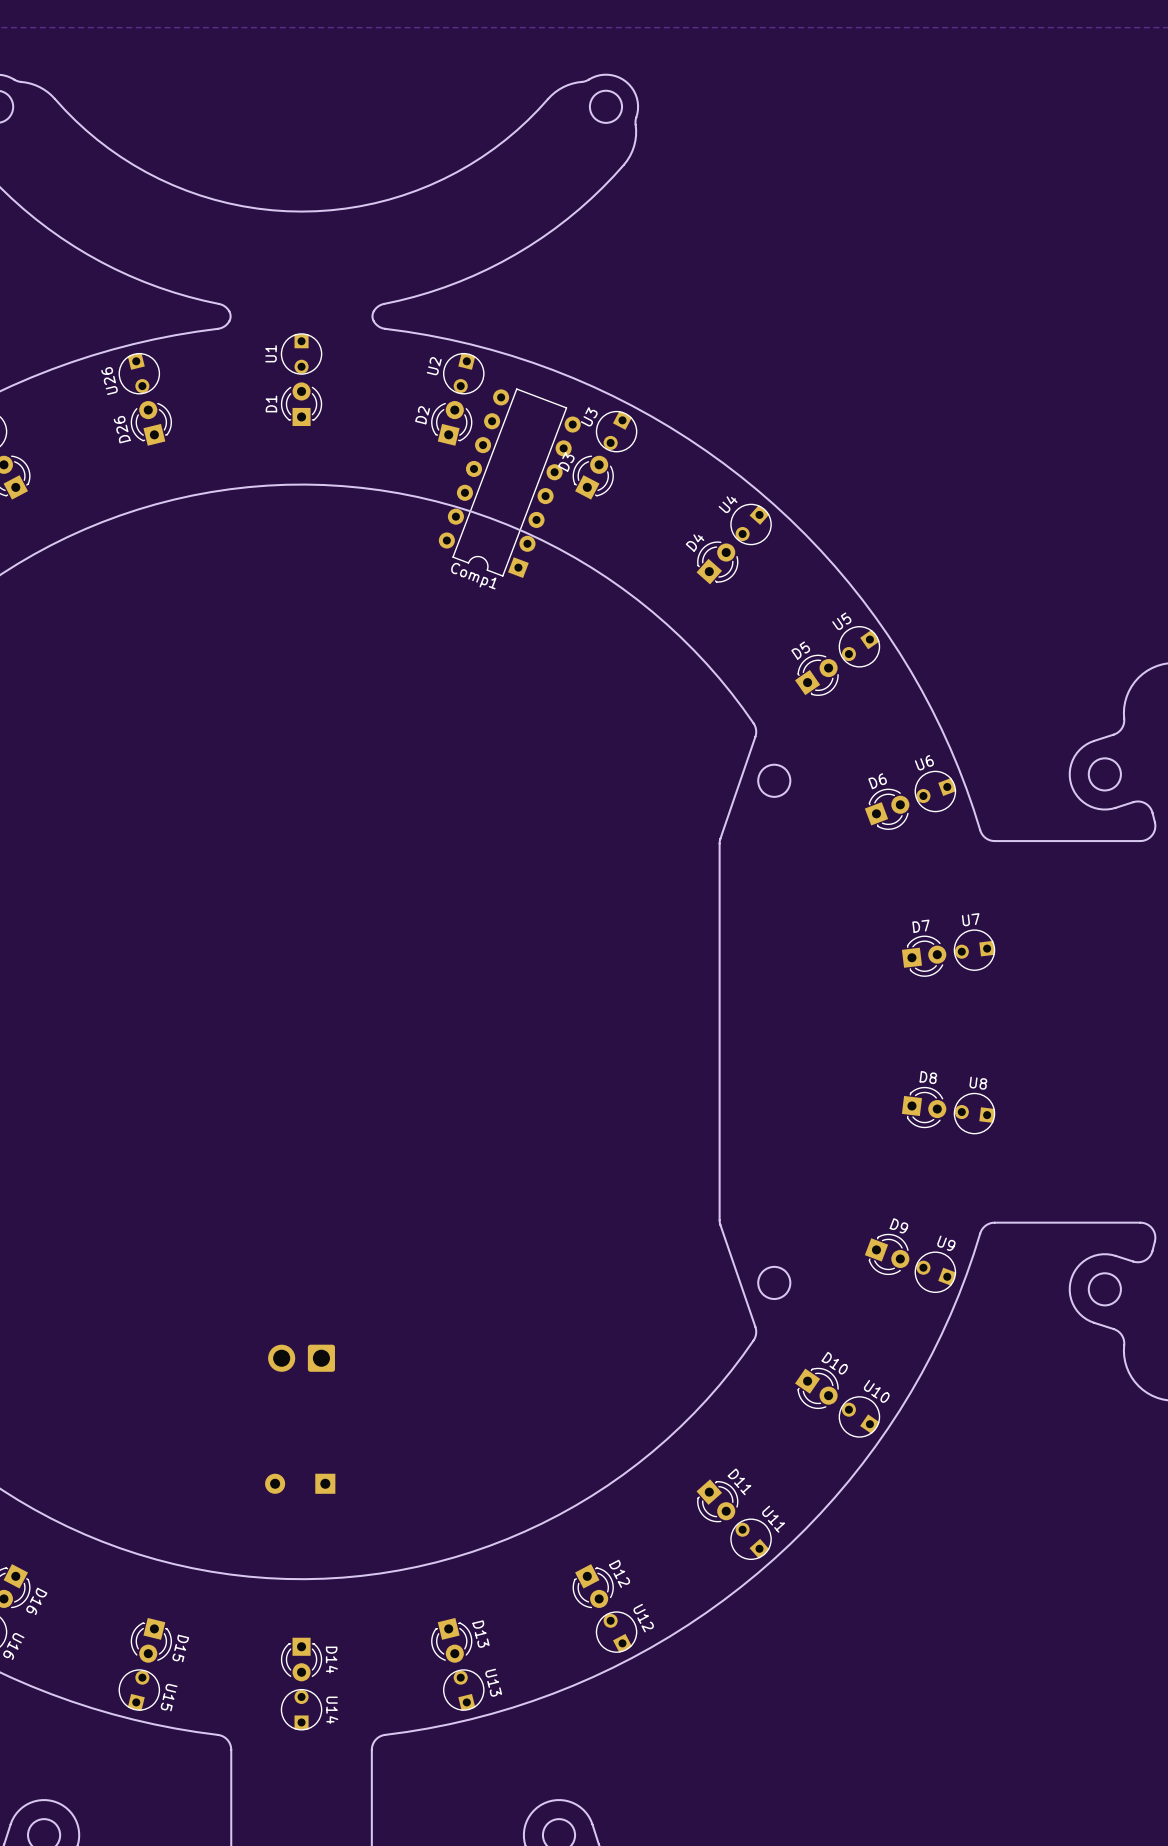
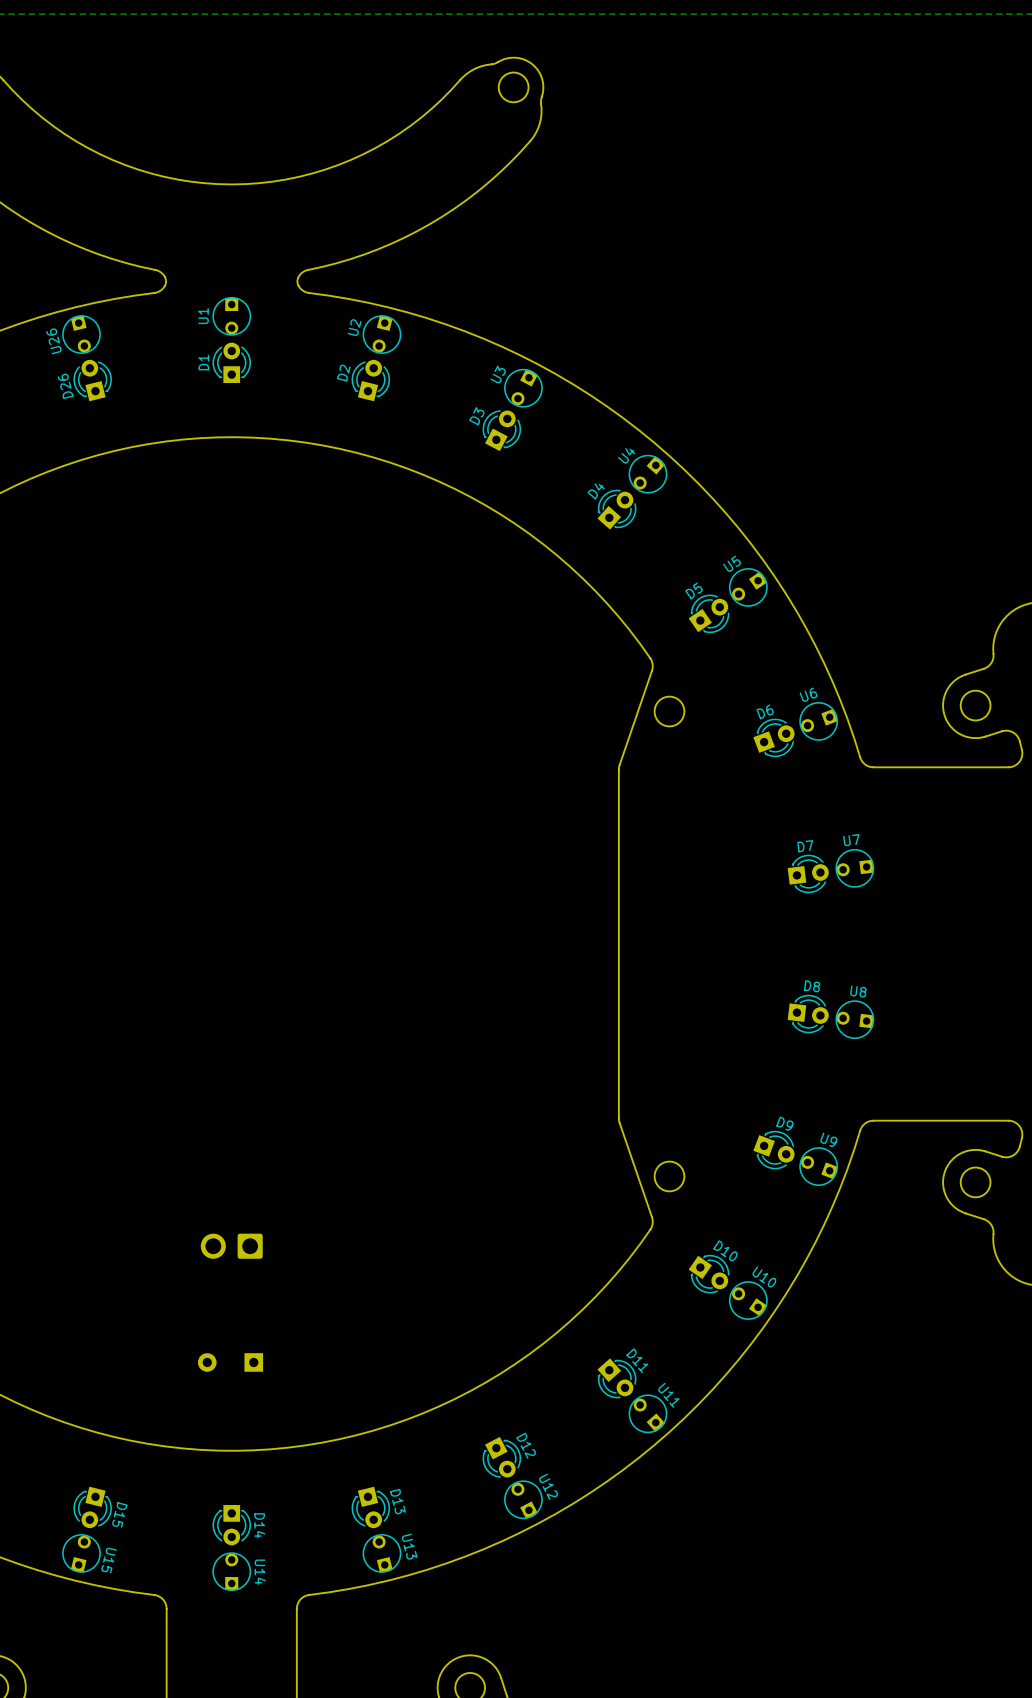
Comp1: (509, 483) -> none

